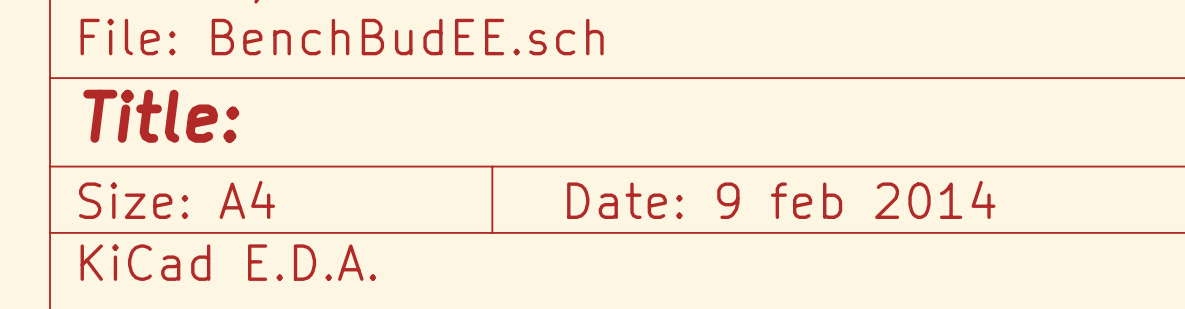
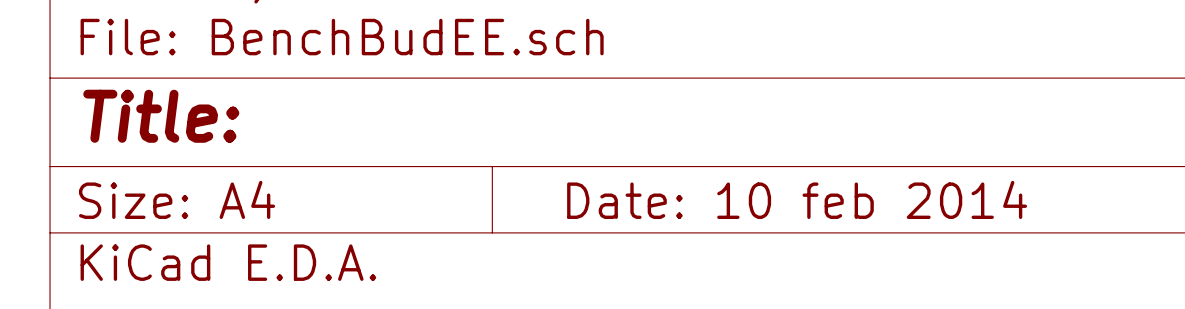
title block: Date: 9 feb 2014 (781, 199) -> Date: 10 feb 2014 (797, 199)

